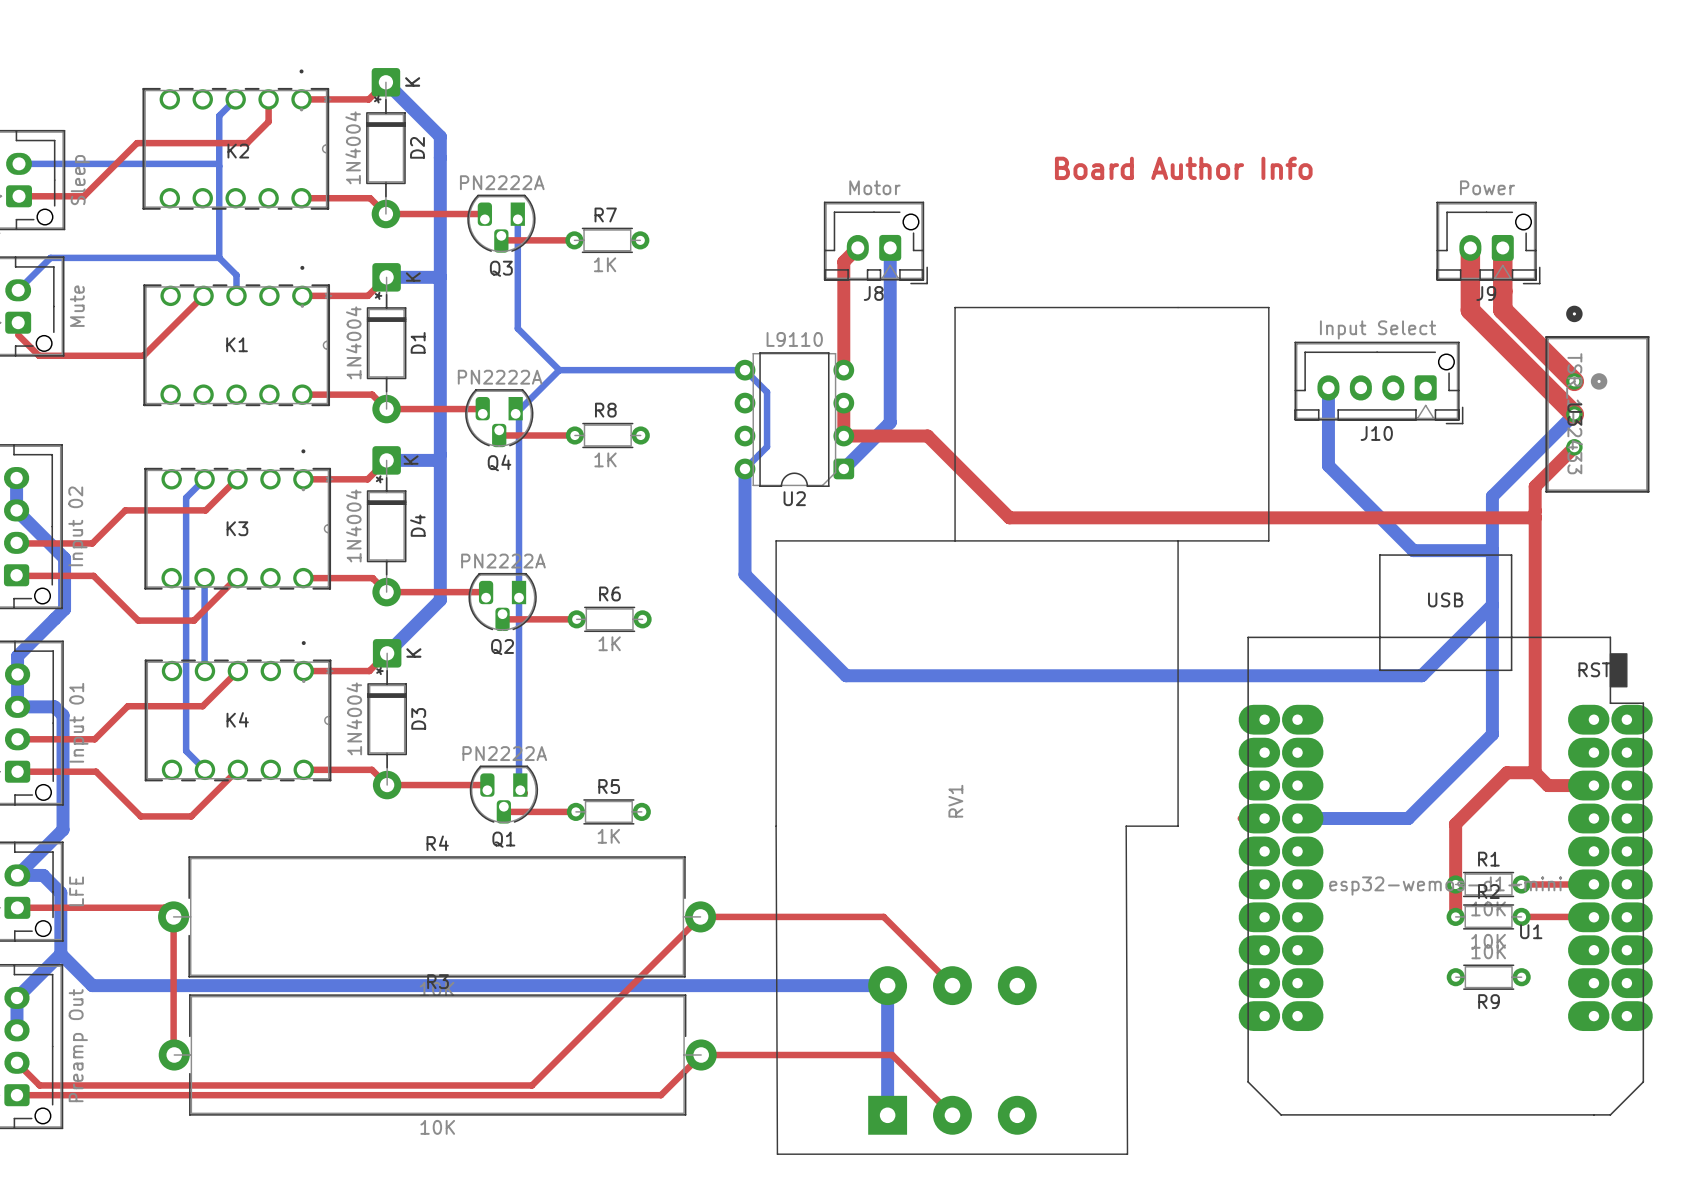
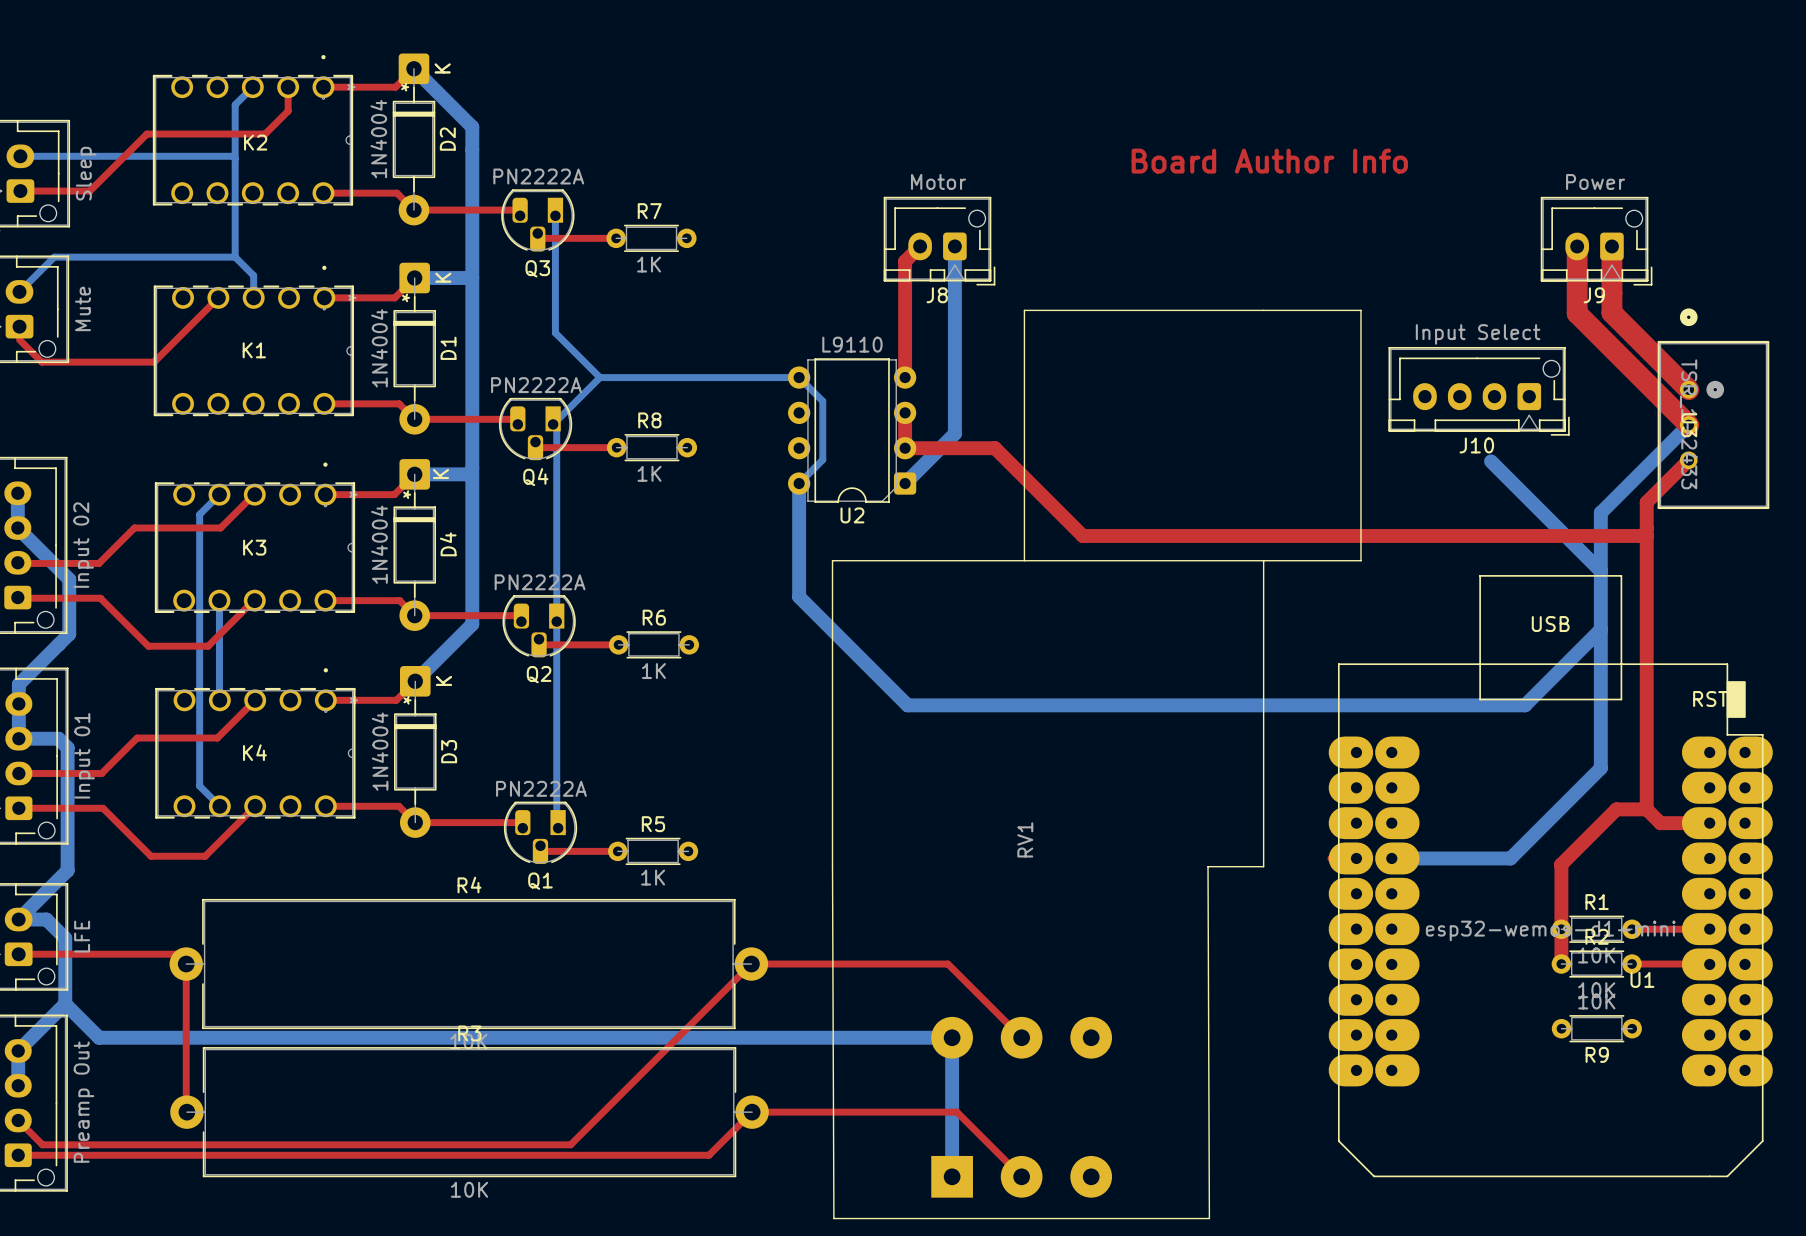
bottom track: (1328, 387) (1328, 465) (1413, 550) (1492, 550) -> (1491, 461) (1600, 571)

